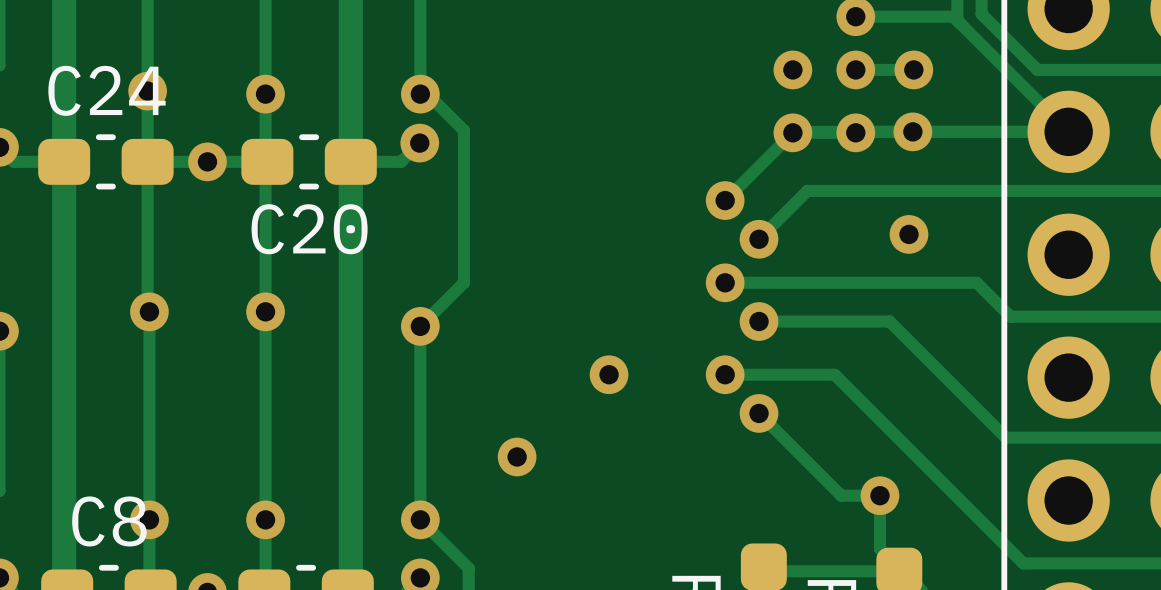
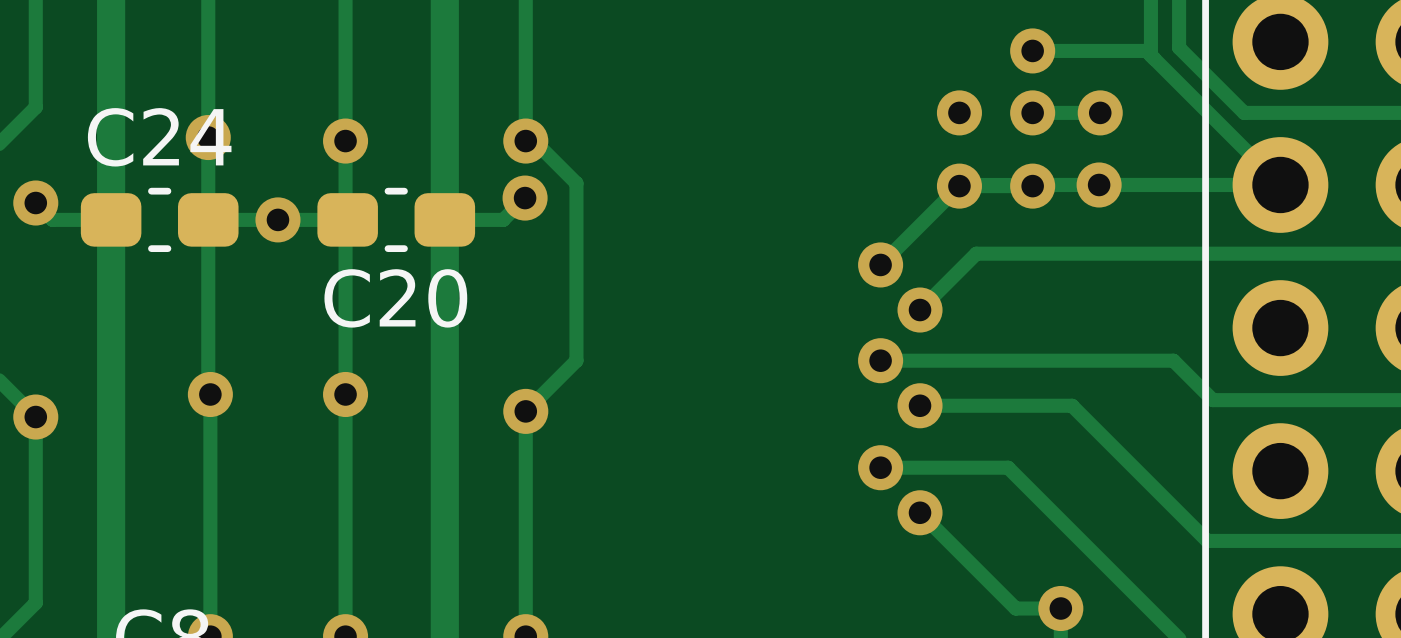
via: (909, 234) -> none
via: (609, 374) -> none
via: (517, 456) -> none

